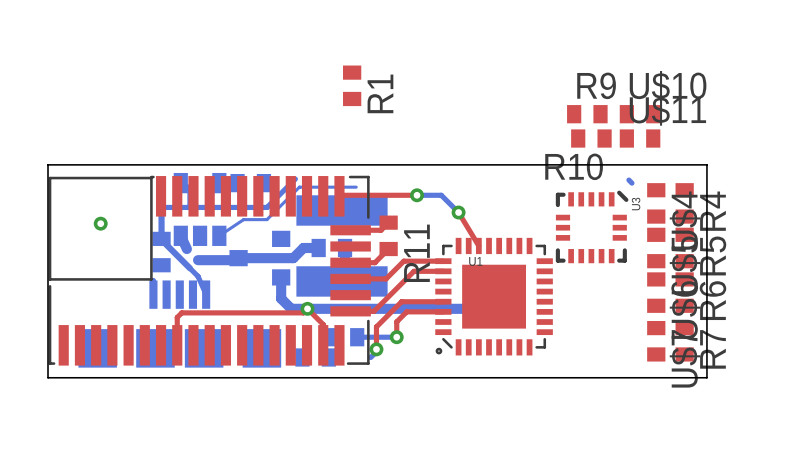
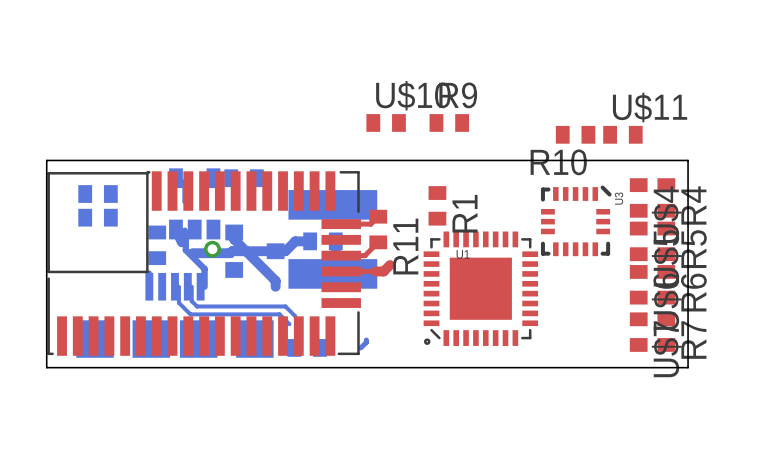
R1 position: (352, 85) -> (437, 205)
R9 position: (587, 114) -> (449, 122)
U$10 position: (640, 114) -> (386, 122)
bottom track: (295, 179) (266, 207) (164, 207) (161, 210) (161, 239) (198, 276) (206, 294) -> none
bottom track: (628, 180) (631, 183) -> none
bottom track: (356, 187) (299, 187) (266, 219) (243, 219) (219, 235) -> none
bottom track: (417, 195) (441, 195) (458, 212) -> none
top track: (417, 195) (339, 196) -> none
via: (417, 195) -> none
part: none -> (98, 194)
top track: (458, 212) (478, 245) -> none
via: (458, 212) -> none
part: none -> (98, 217)
via: (100, 223) -> none
bottom track: none -> (184, 230) (185, 250) (204, 268) (204, 286)
bottom track: none -> (234, 232) (234, 239) (275, 280) (275, 286)
via: none -> (212, 249)
part rotation: 0° (259, 258) -> 180° (254, 251)
top track: (443, 261) (403, 261) (386, 278) -> (390, 265) (383, 271) (375, 271)
top track: (443, 271) (413, 271) (373, 311) (350, 311) -> none
bottom track: (281, 277) (281, 298) (291, 308) (473, 308) (477, 304) -> none
bottom track: none -> (178, 286) (178, 302) (190, 314) (279, 314) (289, 324)
bottom track: none -> (191, 286) (191, 301) (197, 306) (285, 306) (295, 316)
top track: (443, 301) (401, 301) (376, 326) (376, 349) -> none
via: (307, 308) -> none
top track: (443, 311) (406, 311) (396, 321) (396, 337) -> none
part: (344, 337) -> none
bottom track: (357, 337) (396, 337) -> none
via: (396, 337) -> none
top track: (177, 345) (177, 317) (181, 312) (303, 312) (307, 308) (323, 324) (323, 345) -> none
via: (376, 349) -> none

